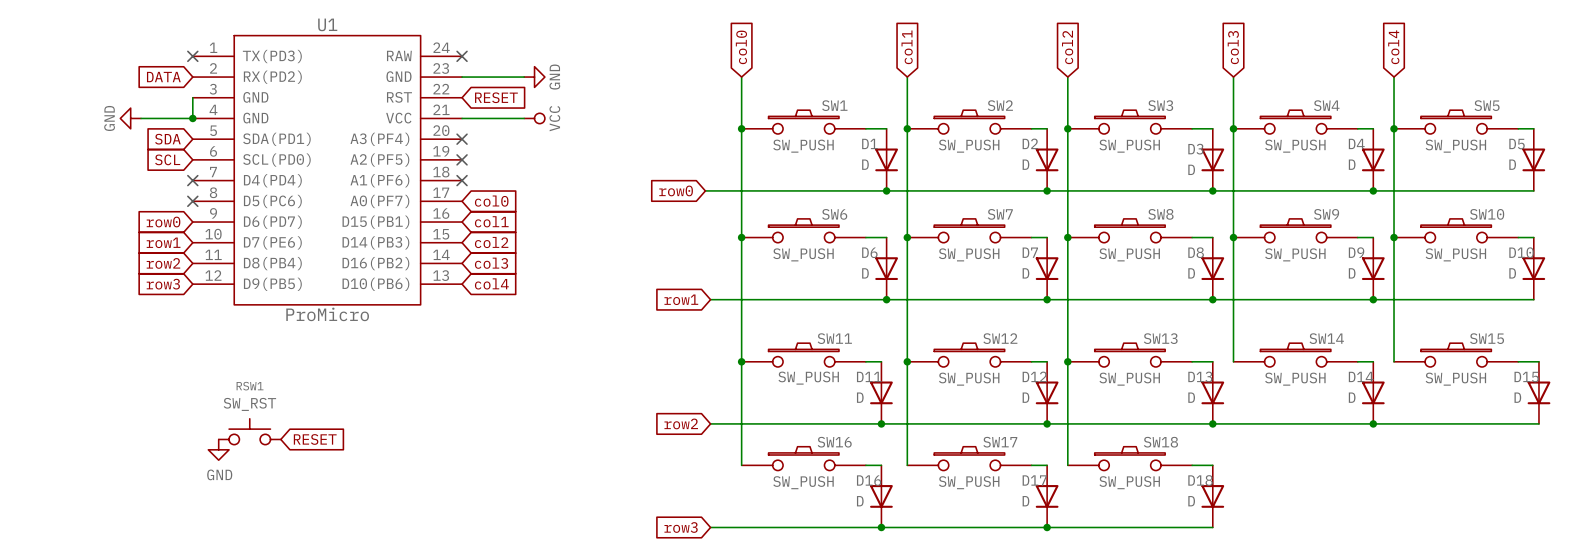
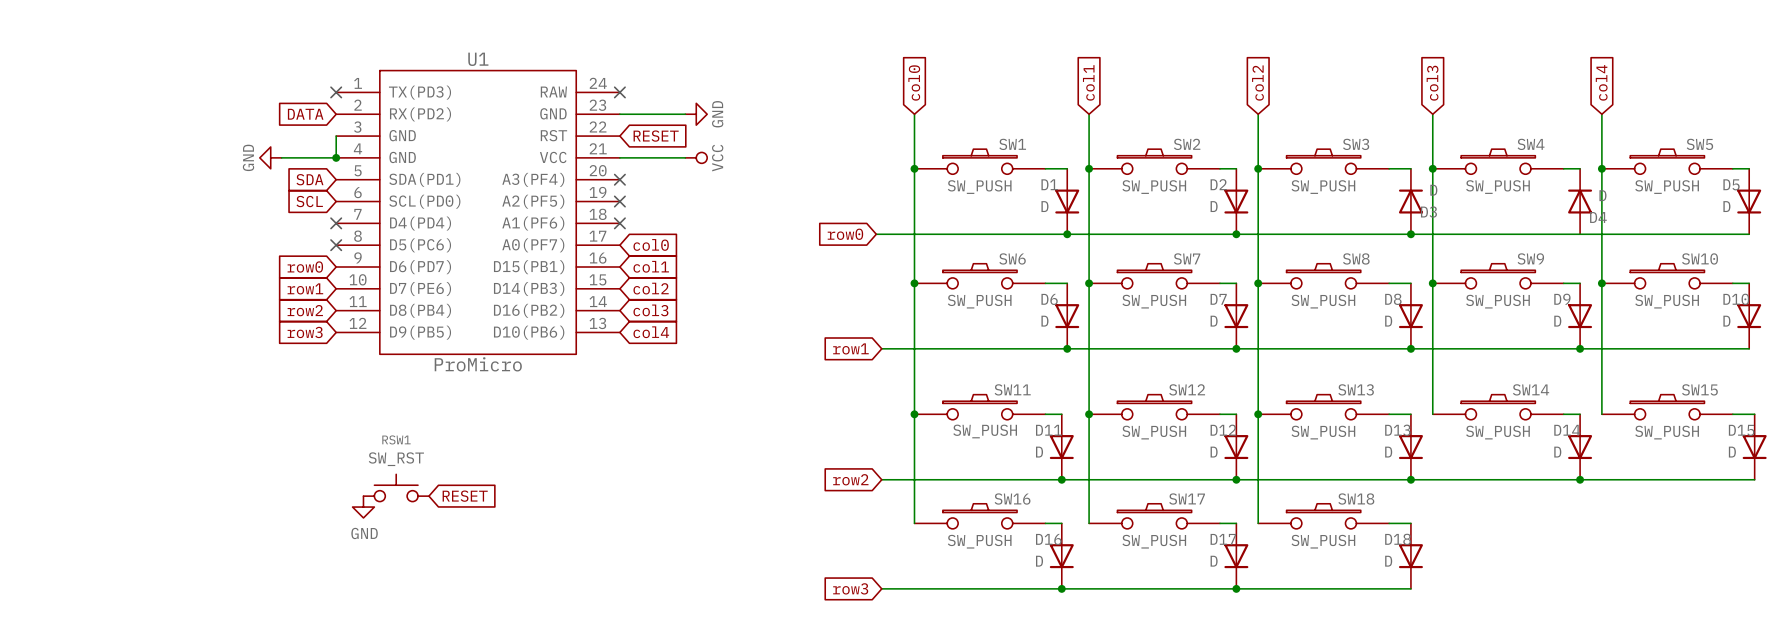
D3 rotation: 0° (1212, 159) -> 180° (1410, 201)
D4 rotation: 0° (1373, 159) -> 180° (1580, 201)
junction: (1373, 190) -> none

